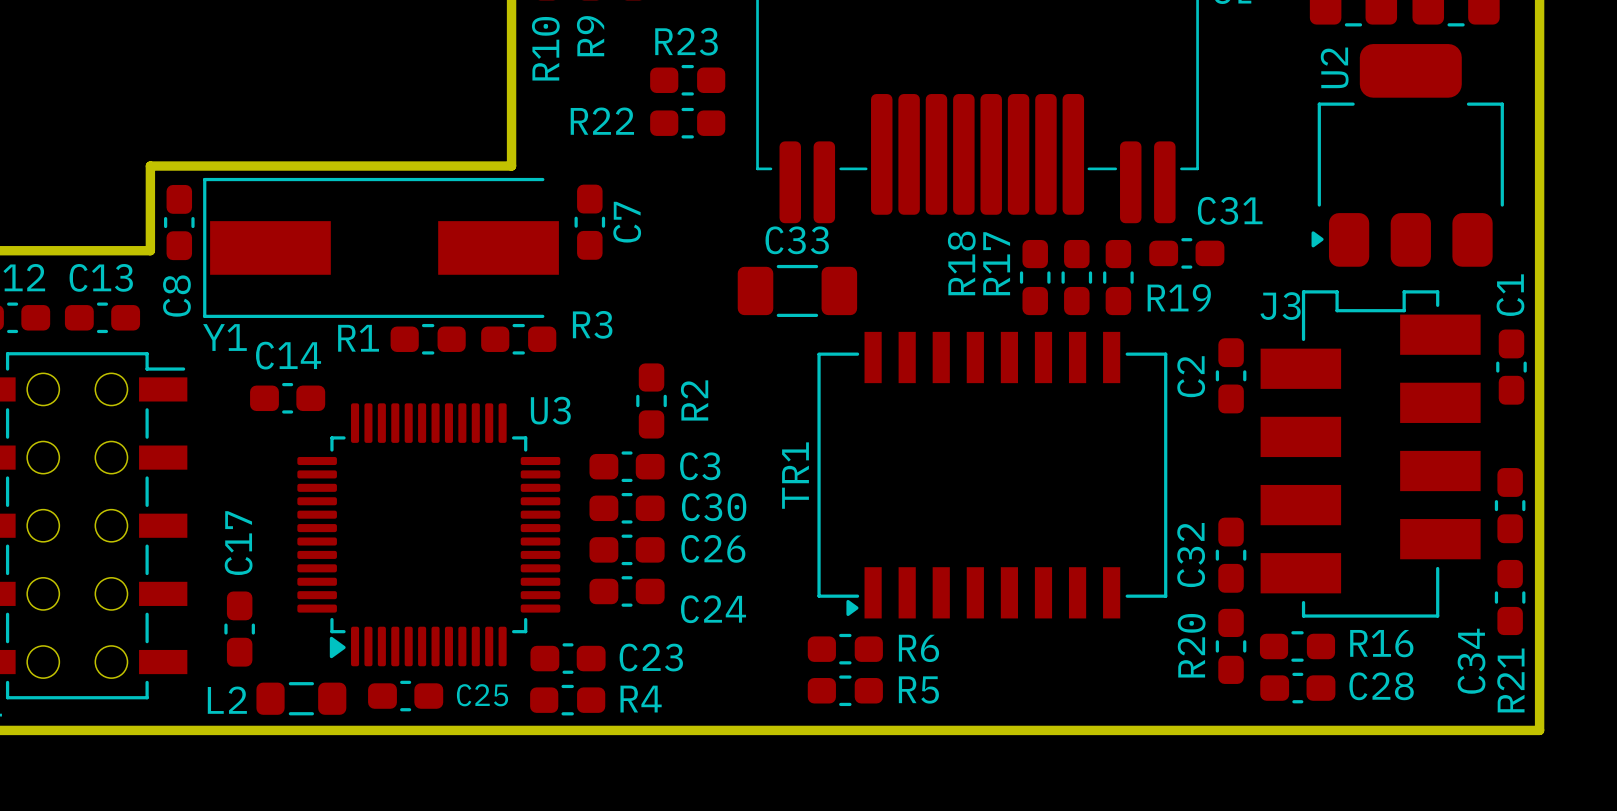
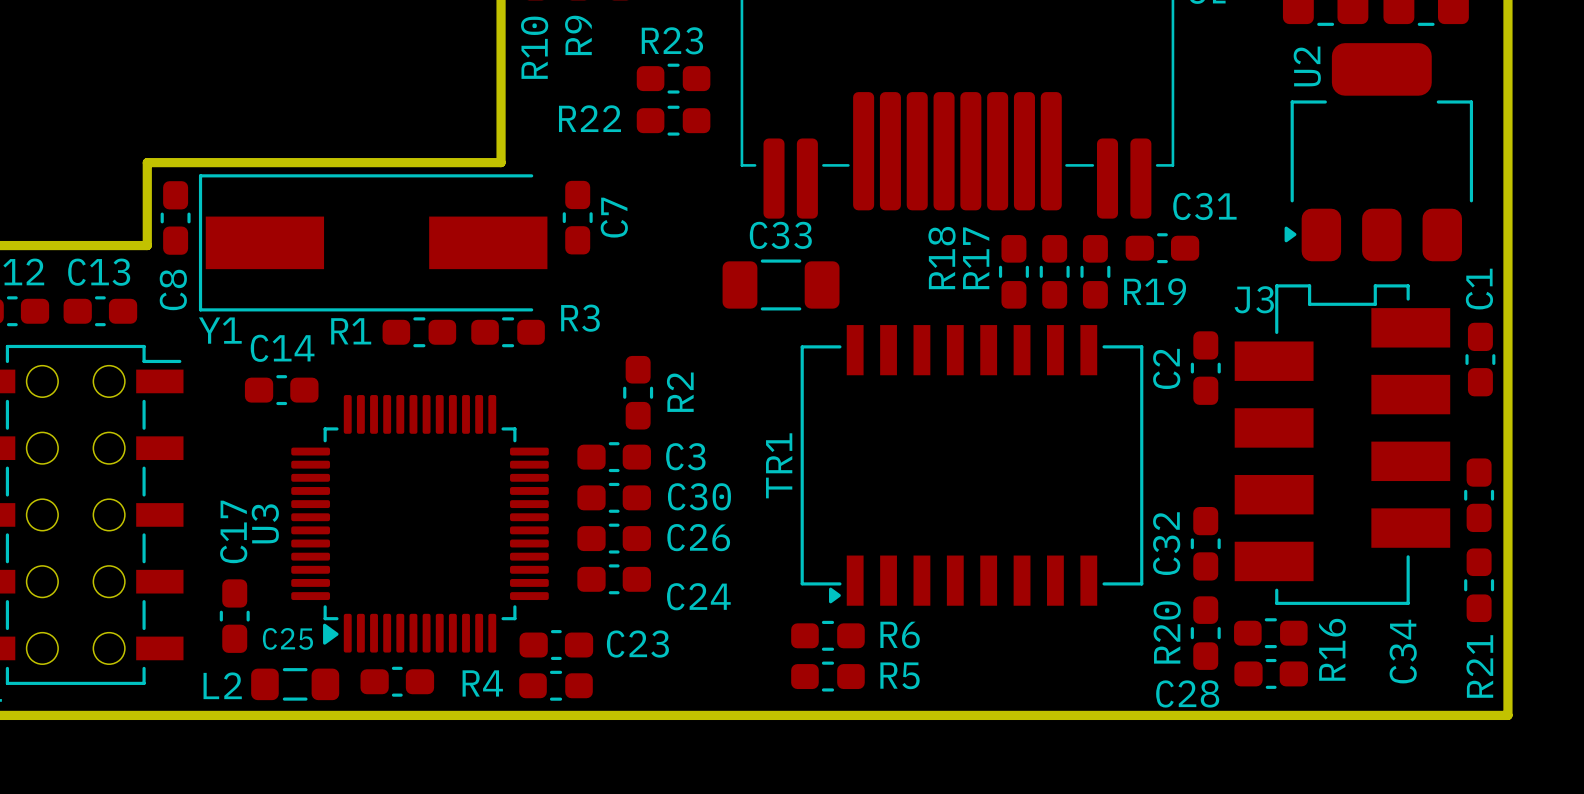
U3 name rotation: 0° (550, 410) -> 90° counterclockwise (265, 523)
U3 name position: U3 (550, 410) -> U3 (265, 523)
R16 name rotation: 0° (1381, 643) -> 90° counterclockwise (1332, 649)
C34 name position: C34 (1471, 661) -> C34 (1403, 651)
C28 name position: C28 (1381, 686) -> C28 (1187, 693)
C25 name position: C25 (482, 695) -> C25 (287, 638)
R4 name position: R4 (641, 699) -> R4 (482, 683)

